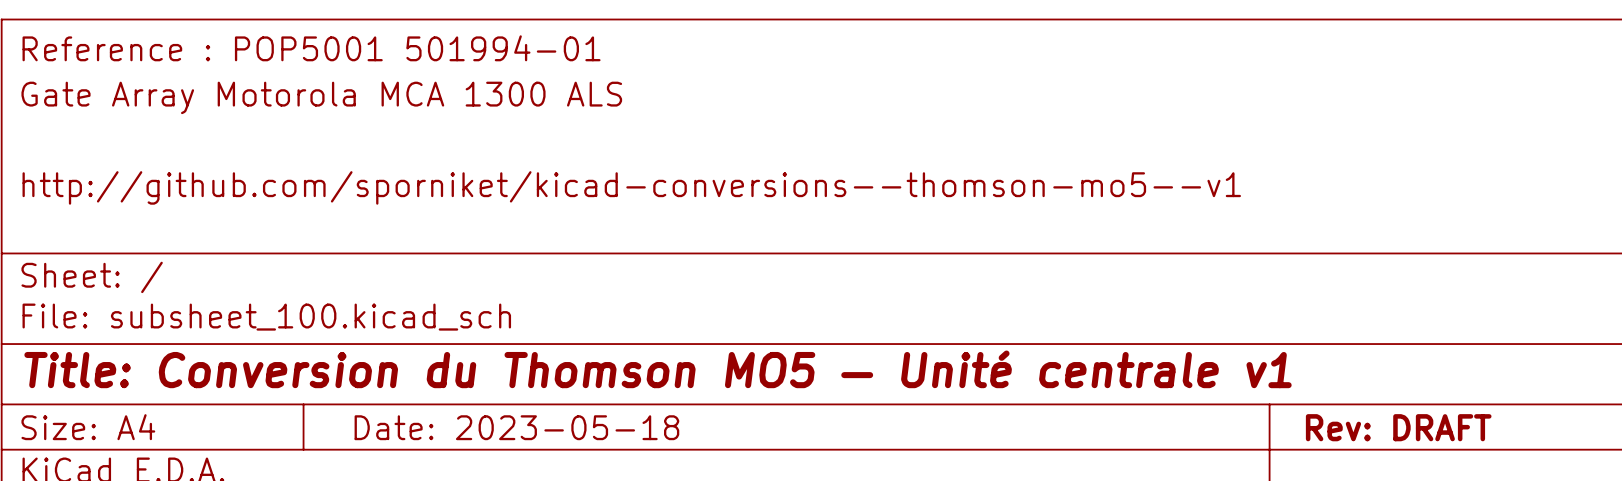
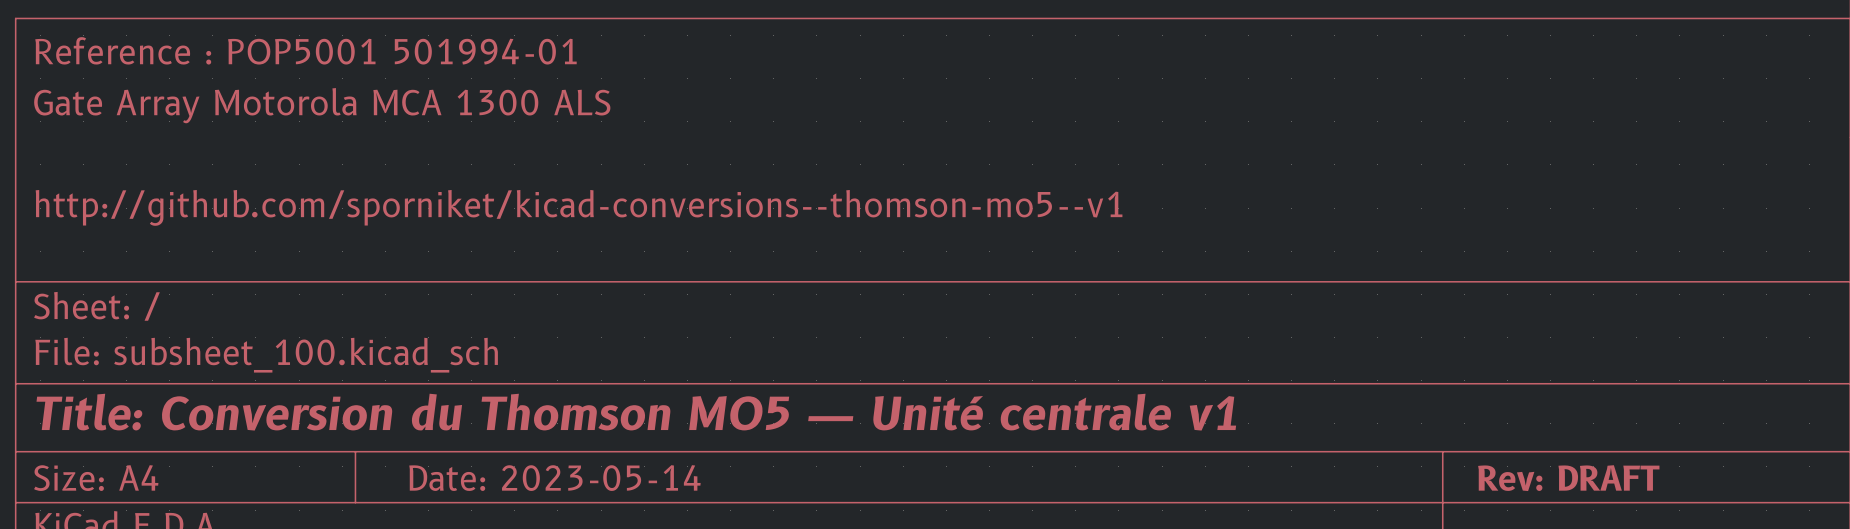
title block: Date: 2023-05-18 (516, 427) -> Date: 2023-05-14 (554, 478)

